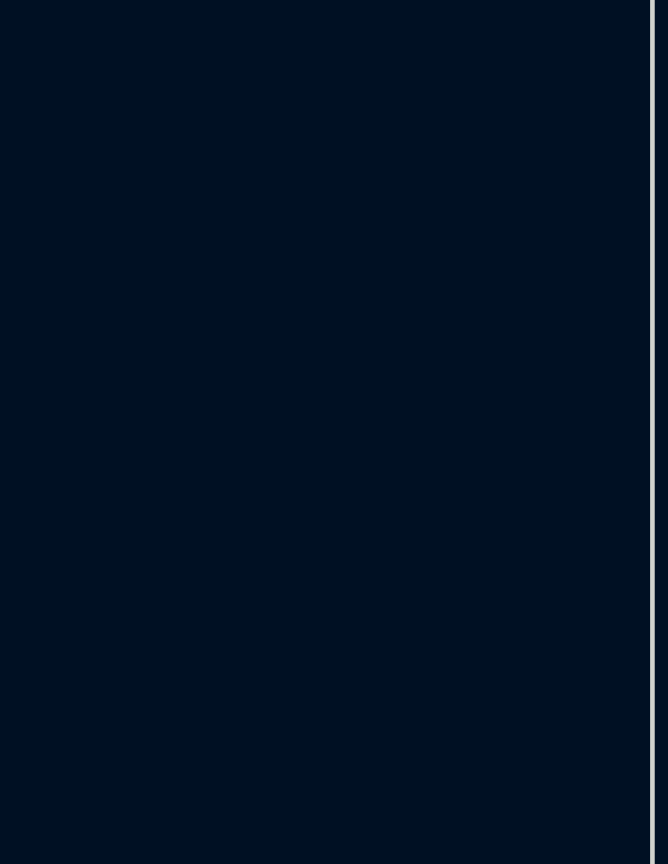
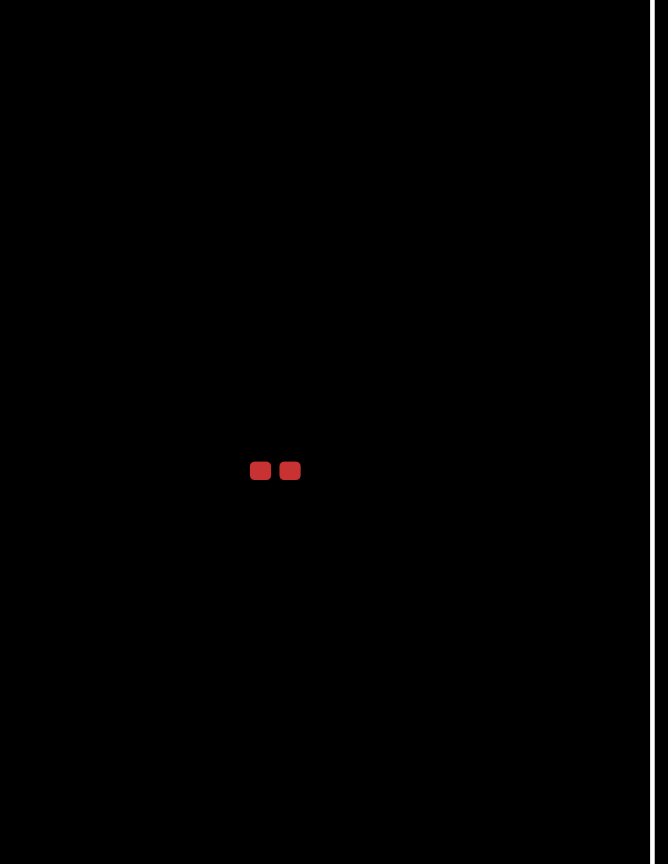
part: none -> (275, 470)

